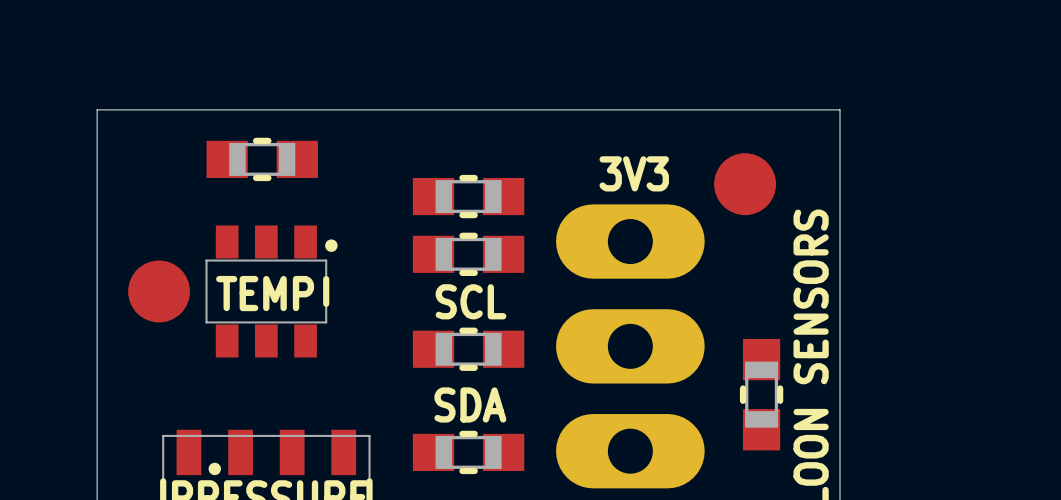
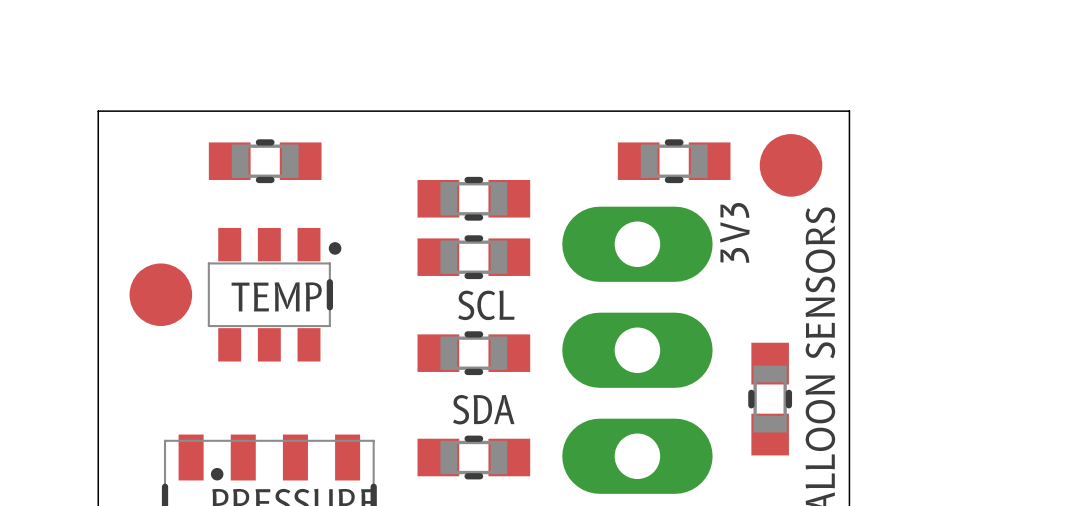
part: none -> (674, 161)
text rotation: 0° (634, 173) -> 90° counterclockwise (734, 232)
text position: 3V3 (634, 173) -> 3V3 (734, 232)
part position: (745, 184) -> (791, 165)

